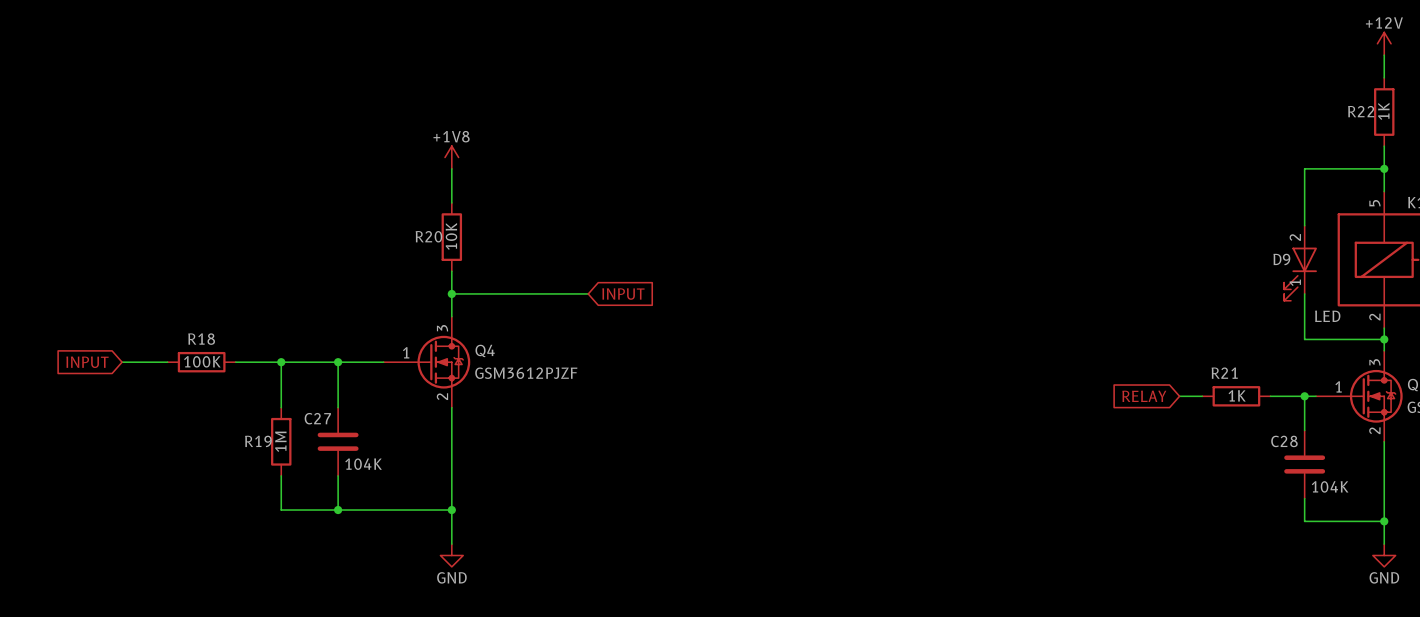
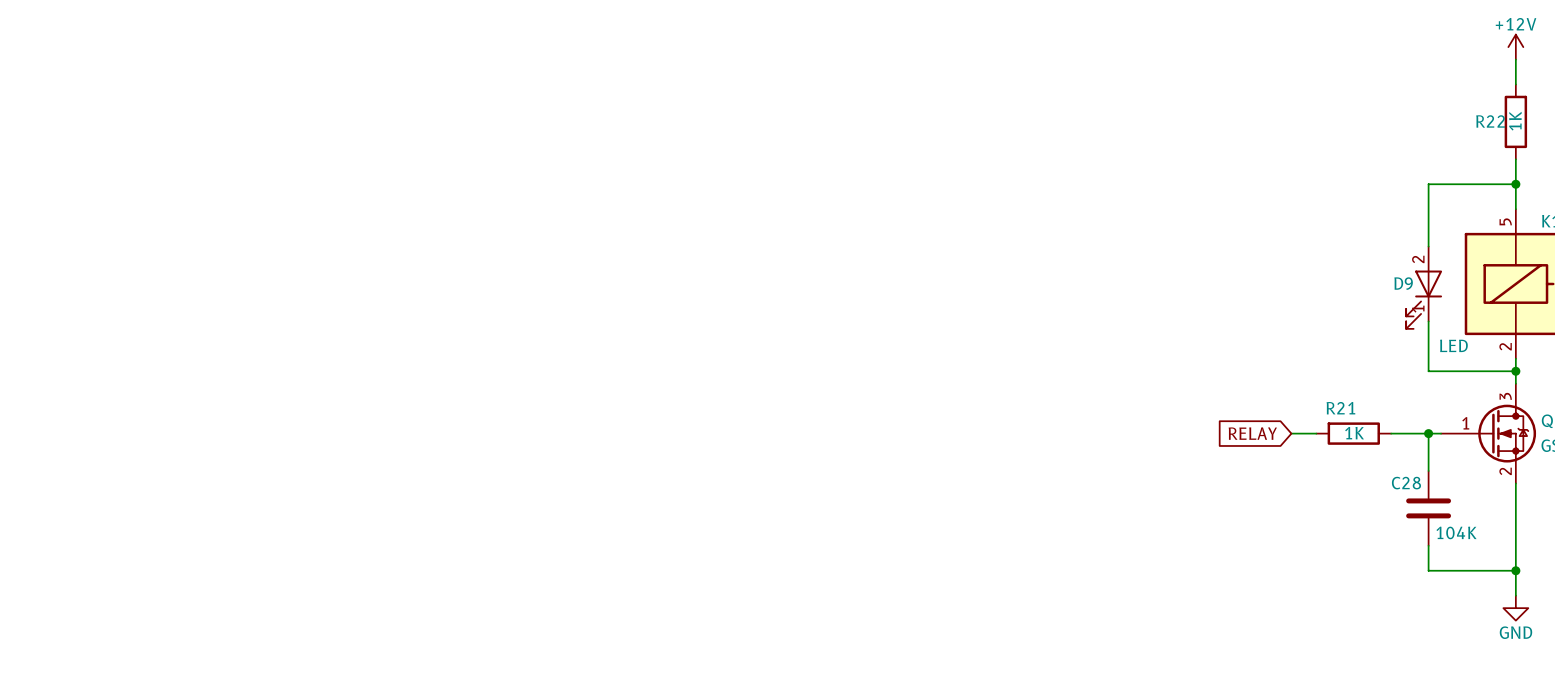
power symbol: +1V8 (451, 157) -> none
wire: (451, 168) (451, 202) -> none
R20: 10K (451, 237) -> none
wire: (451, 271) (451, 316) -> none
wire: (451, 293) (588, 293) -> none
junction: (451, 293) -> none
global label: INPUT (623, 294) -> none
global label: INPUT (87, 362) -> none
wire: (122, 362) (167, 362) -> none
R18: 100K (201, 362) -> none
wire: (235, 362) (383, 362) -> none
wire: (281, 362) (281, 407) -> none
junction: (281, 362) -> none
wire: (338, 362) (338, 407) -> none
junction: (338, 362) -> none
Q4: GSM3612PJZF (426, 362) -> none
wire: (451, 407) (451, 544) -> none
R19: 1M (281, 441) -> none
C27: 104K (338, 441) -> none
wire: (281, 475) (281, 510) (451, 510) -> none
wire: (338, 475) (338, 510) -> none
junction: (338, 510) -> none
junction: (451, 510) -> none
power symbol: GND (451, 555) -> none

